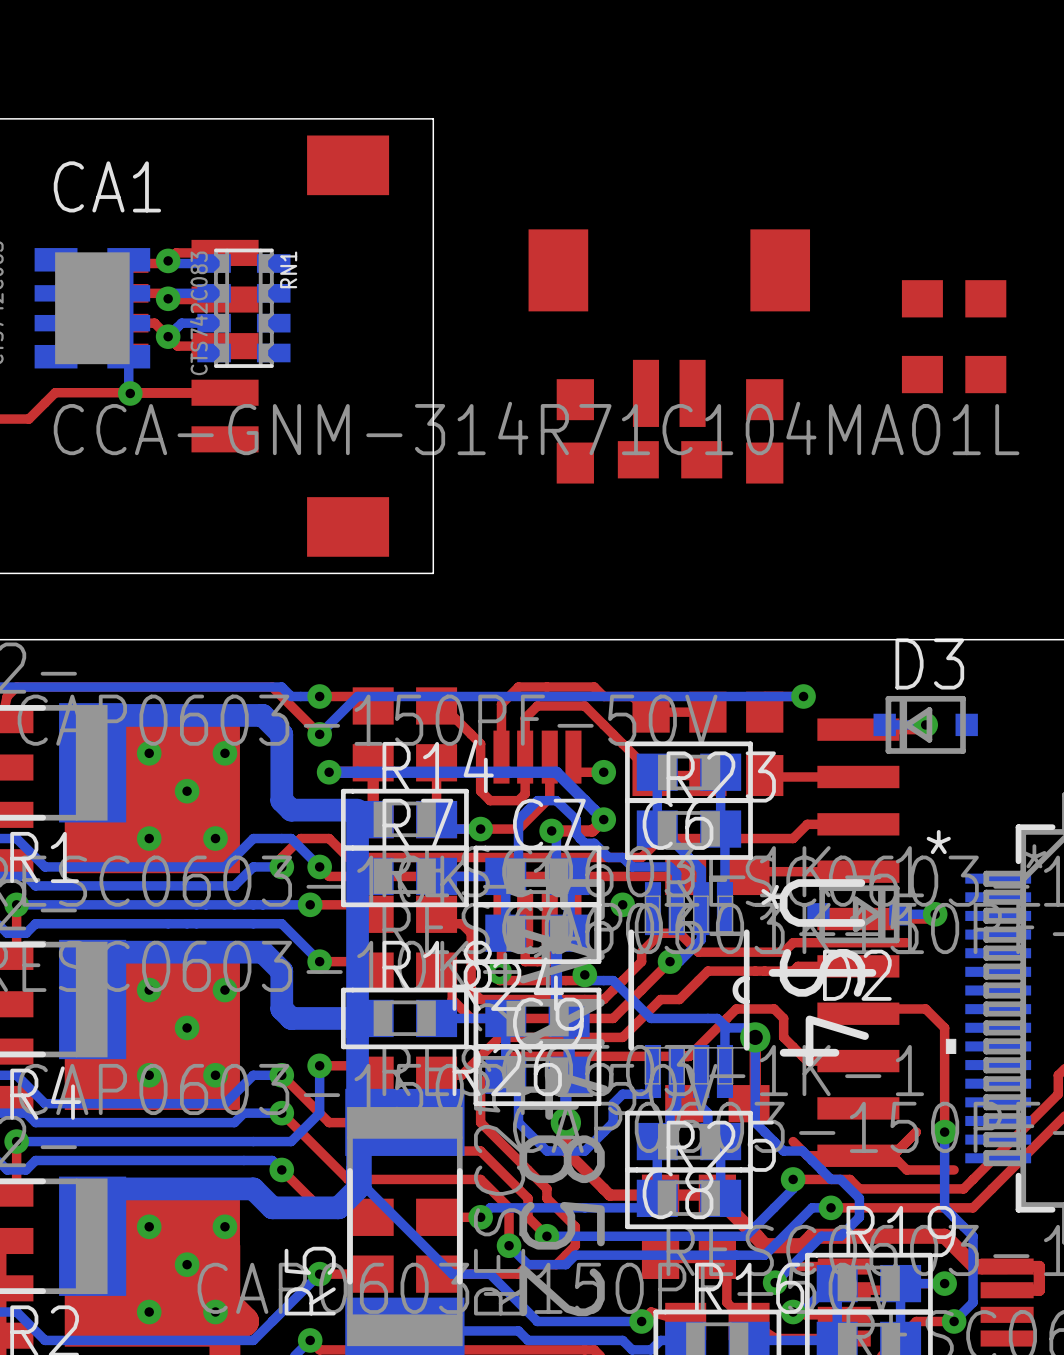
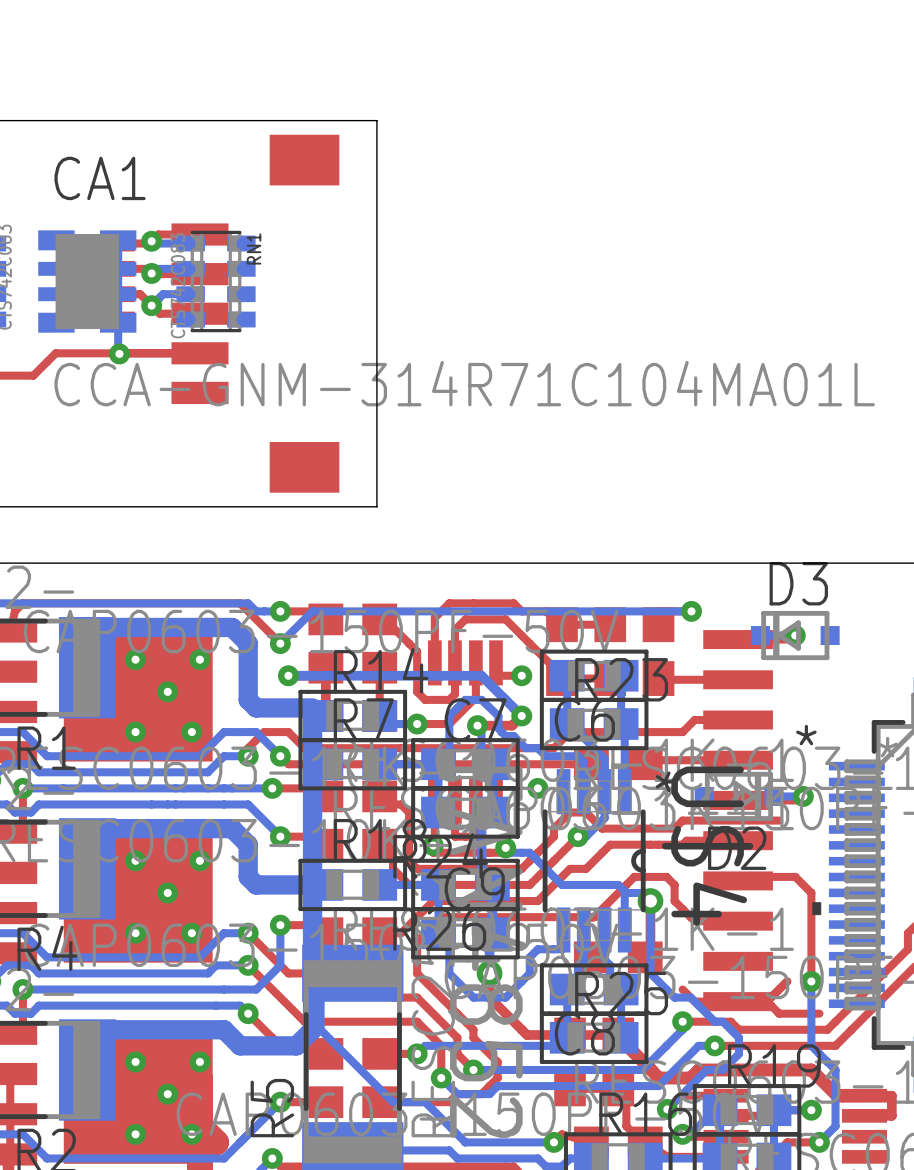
part: (954, 298) -> none
part: (669, 328) -> none
part: (954, 374) -> none
part: (575, 431) -> none
part: (764, 431) -> none
part: (670, 459) -> none

